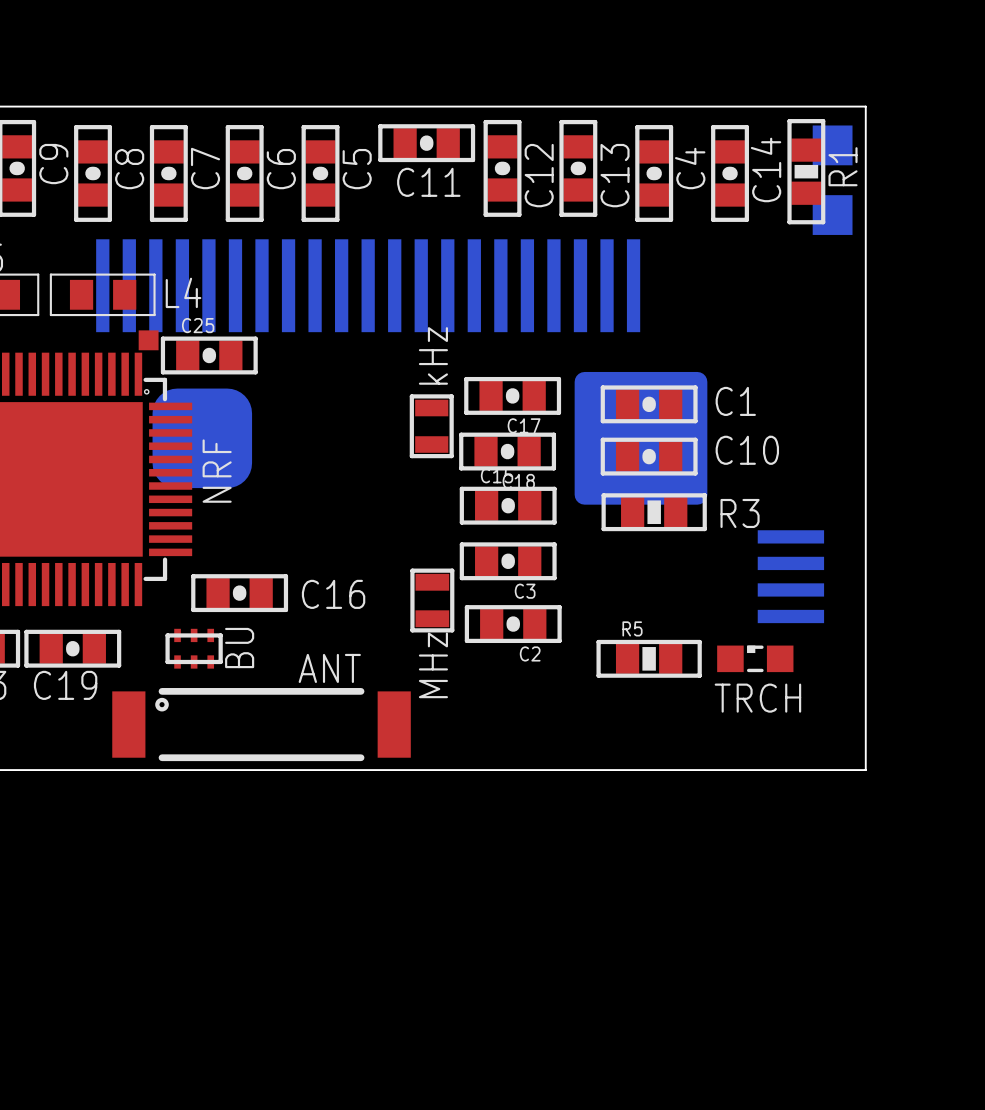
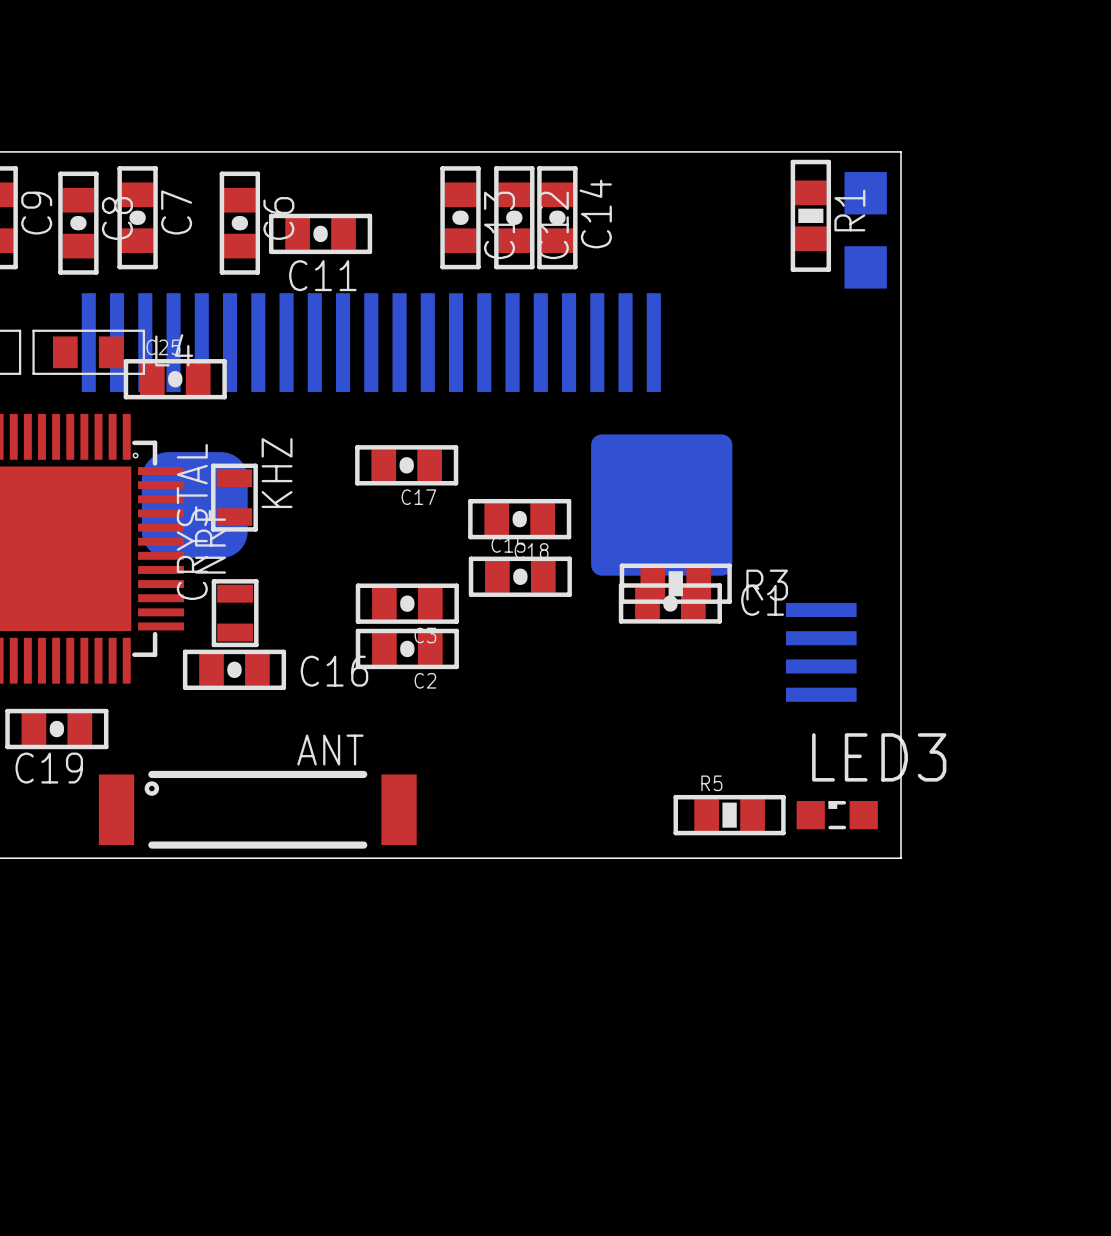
C11 position: (426, 143) -> (320, 233)
C13 position: (578, 168) -> (460, 217)
R1 position: (806, 171) -> (810, 215)
C7 position: (168, 173) -> (137, 217)
C5: (320, 173) -> none
C4: (654, 173) -> none
C14 position: (730, 173) -> (557, 217)
part: (148, 340) -> none
C25 position: (209, 355) -> (175, 379)
text: kHz (433, 355) -> none
C17 position: (512, 395) -> (406, 465)
C1 position: (649, 404) -> (670, 603)
part: (431, 426) -> none
KHZ: none -> CRYSTAL (234, 497)
C10: (649, 456) -> none
part: none -> (235, 613)
C3 position: (508, 561) -> (407, 603)
part: (432, 600) -> none
C2 position: (513, 624) -> (407, 648)
BU: (194, 648) -> none
R5 position: (649, 658) -> (729, 815)
TRCH: (755, 658) -> none
text: MHz (433, 665) -> none
LED3: none -> (837, 815)

